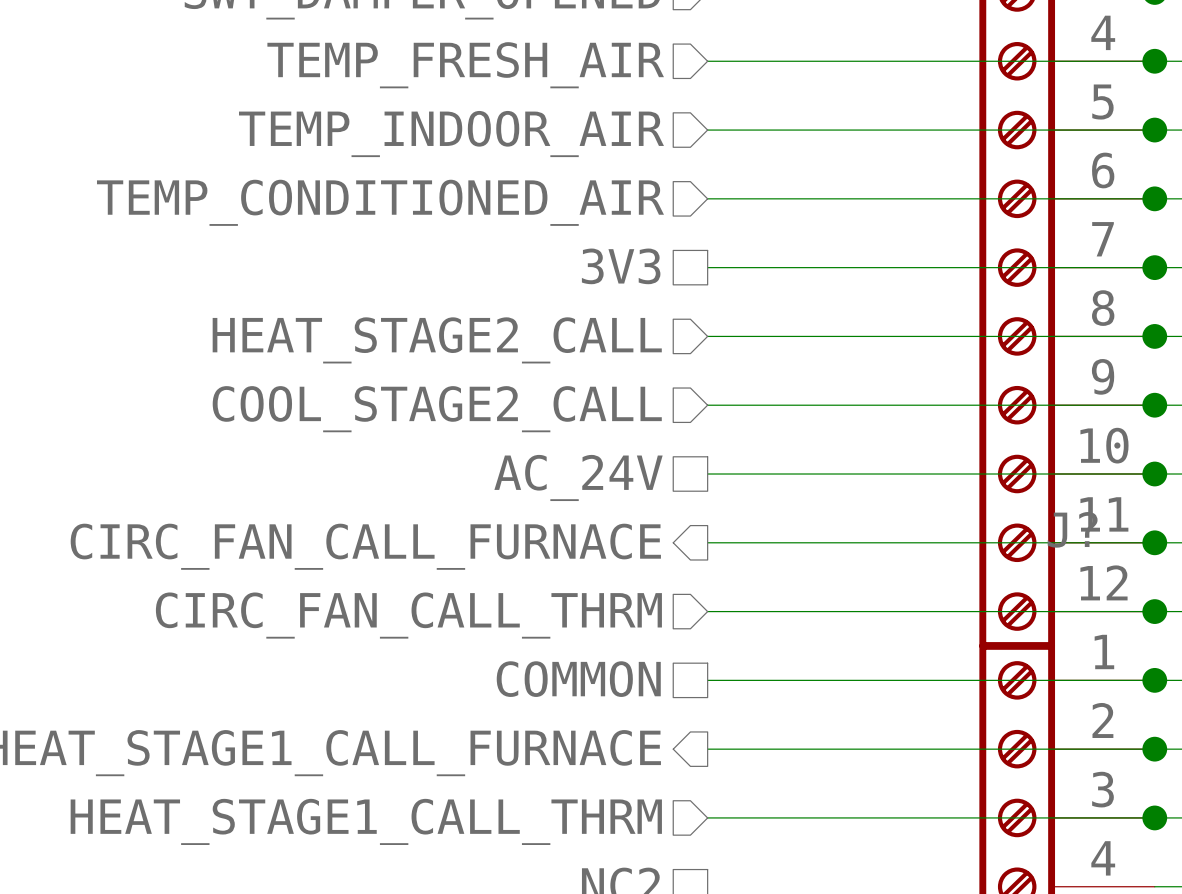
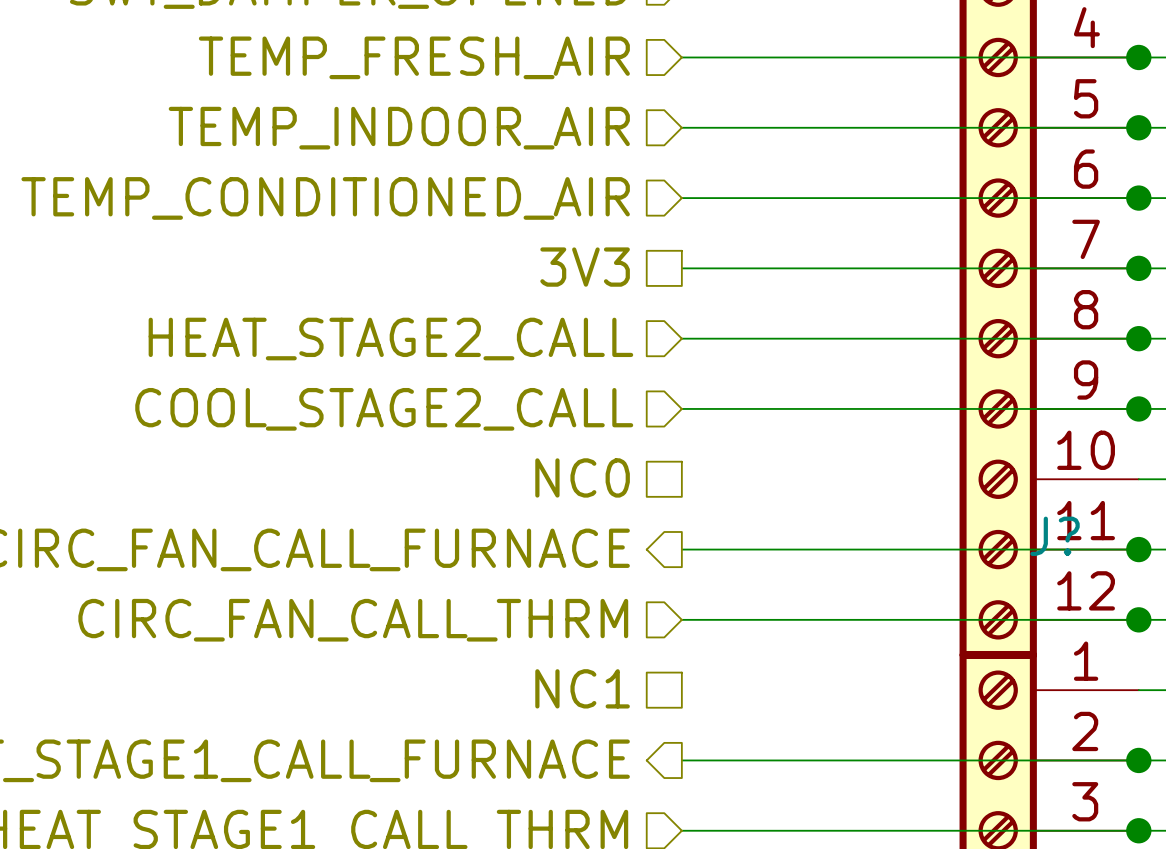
wire: (707, 474) (1154, 474) -> none
junction: (1154, 474) -> none
hierarchical label: AC_24V (578, 477) -> NC0 (582, 477)
hierarchical label: COMMON (578, 679) -> NC1 (582, 688)
wire: (707, 680) (1154, 680) -> none
junction: (1154, 680) -> none

